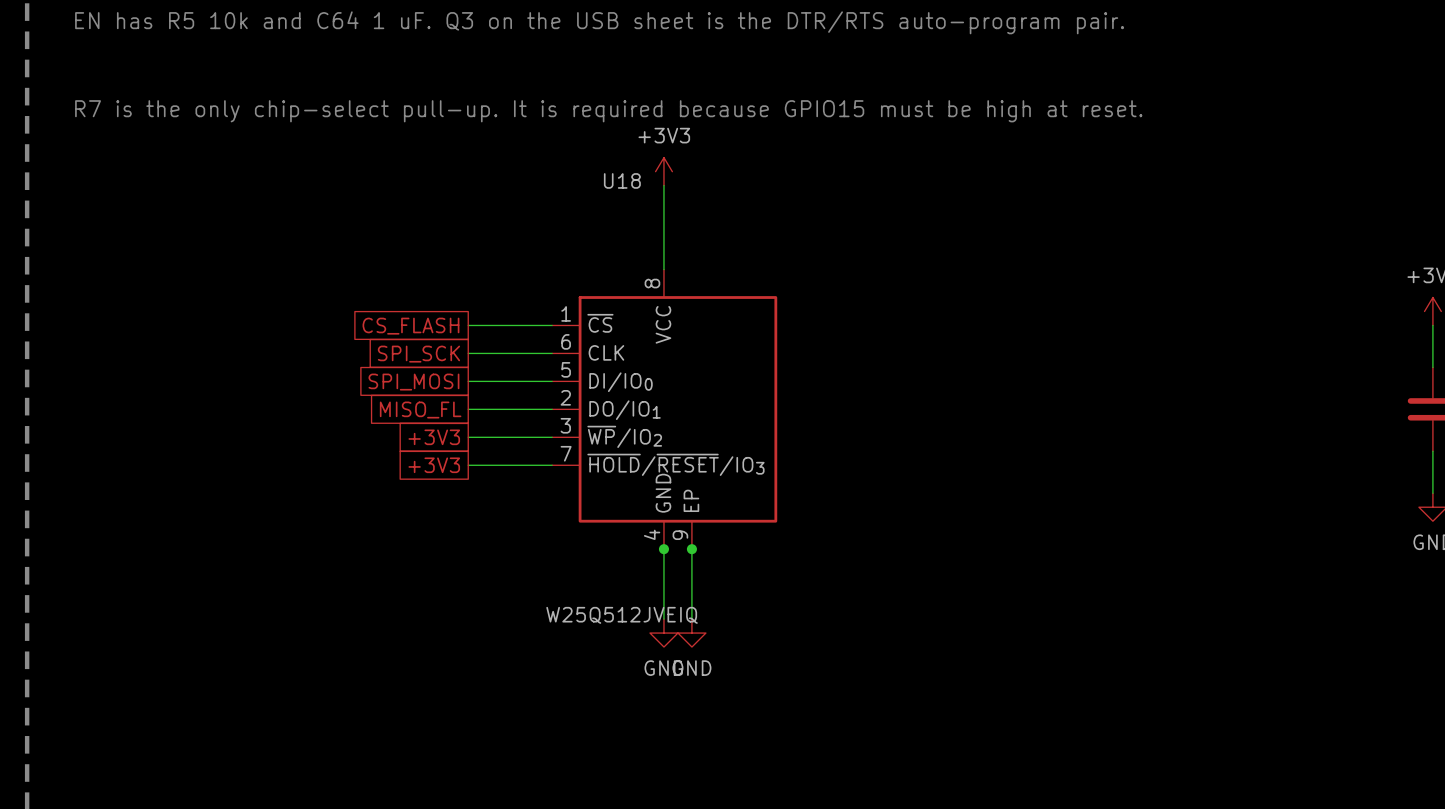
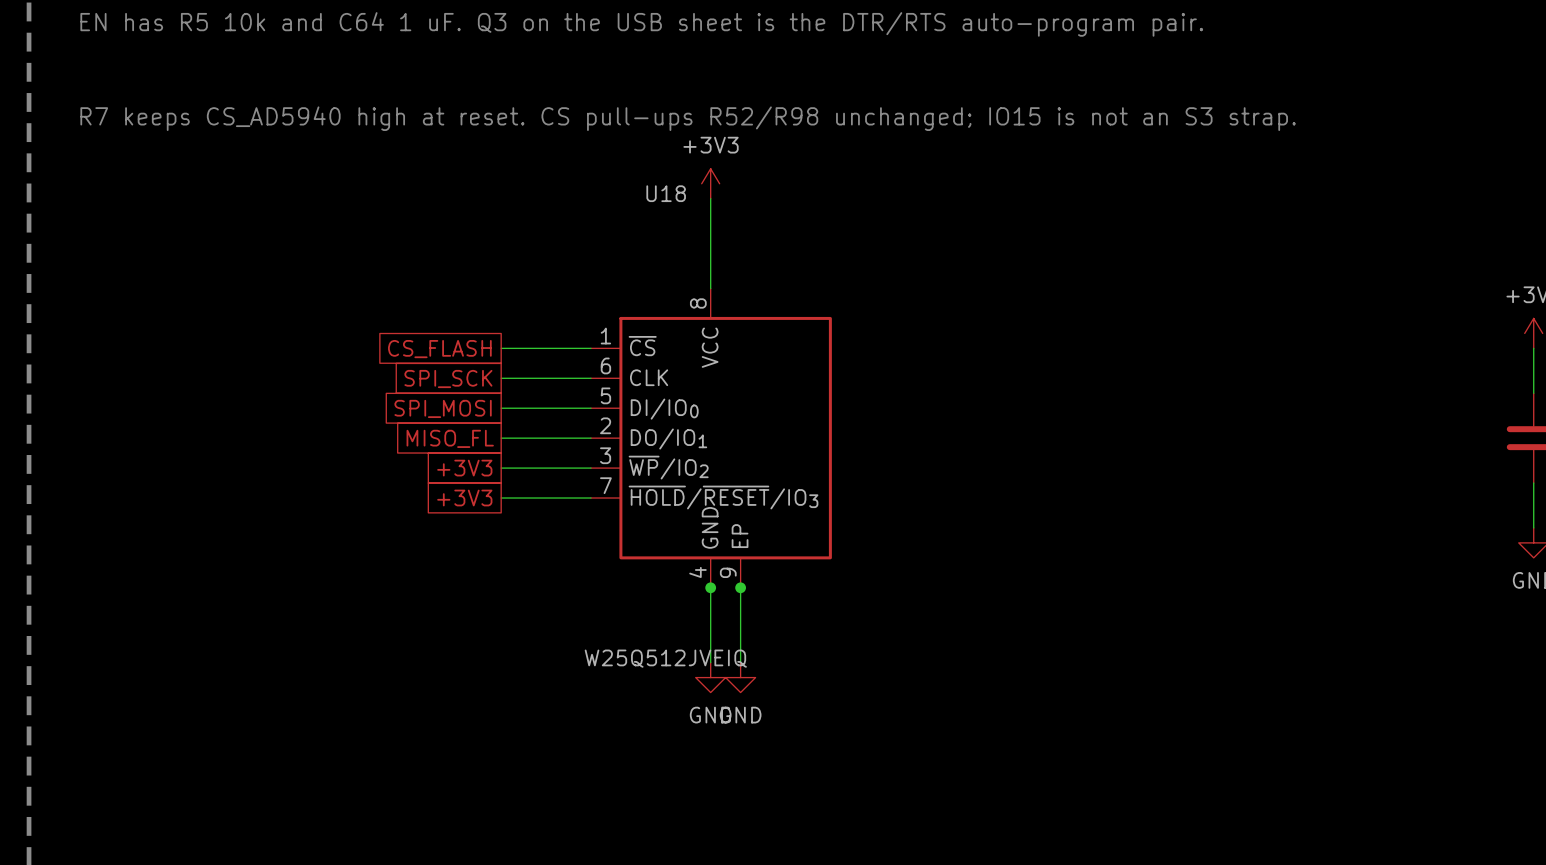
text: R7 is the only chip-select pull-up. It is required because GPIO15 must be high at reset. (608, 111) -> R7 keeps CS_AD5940 high at reset. CS pull-ups R52/R98 unchanged; IO15 is not an S3 strap. (688, 118)

